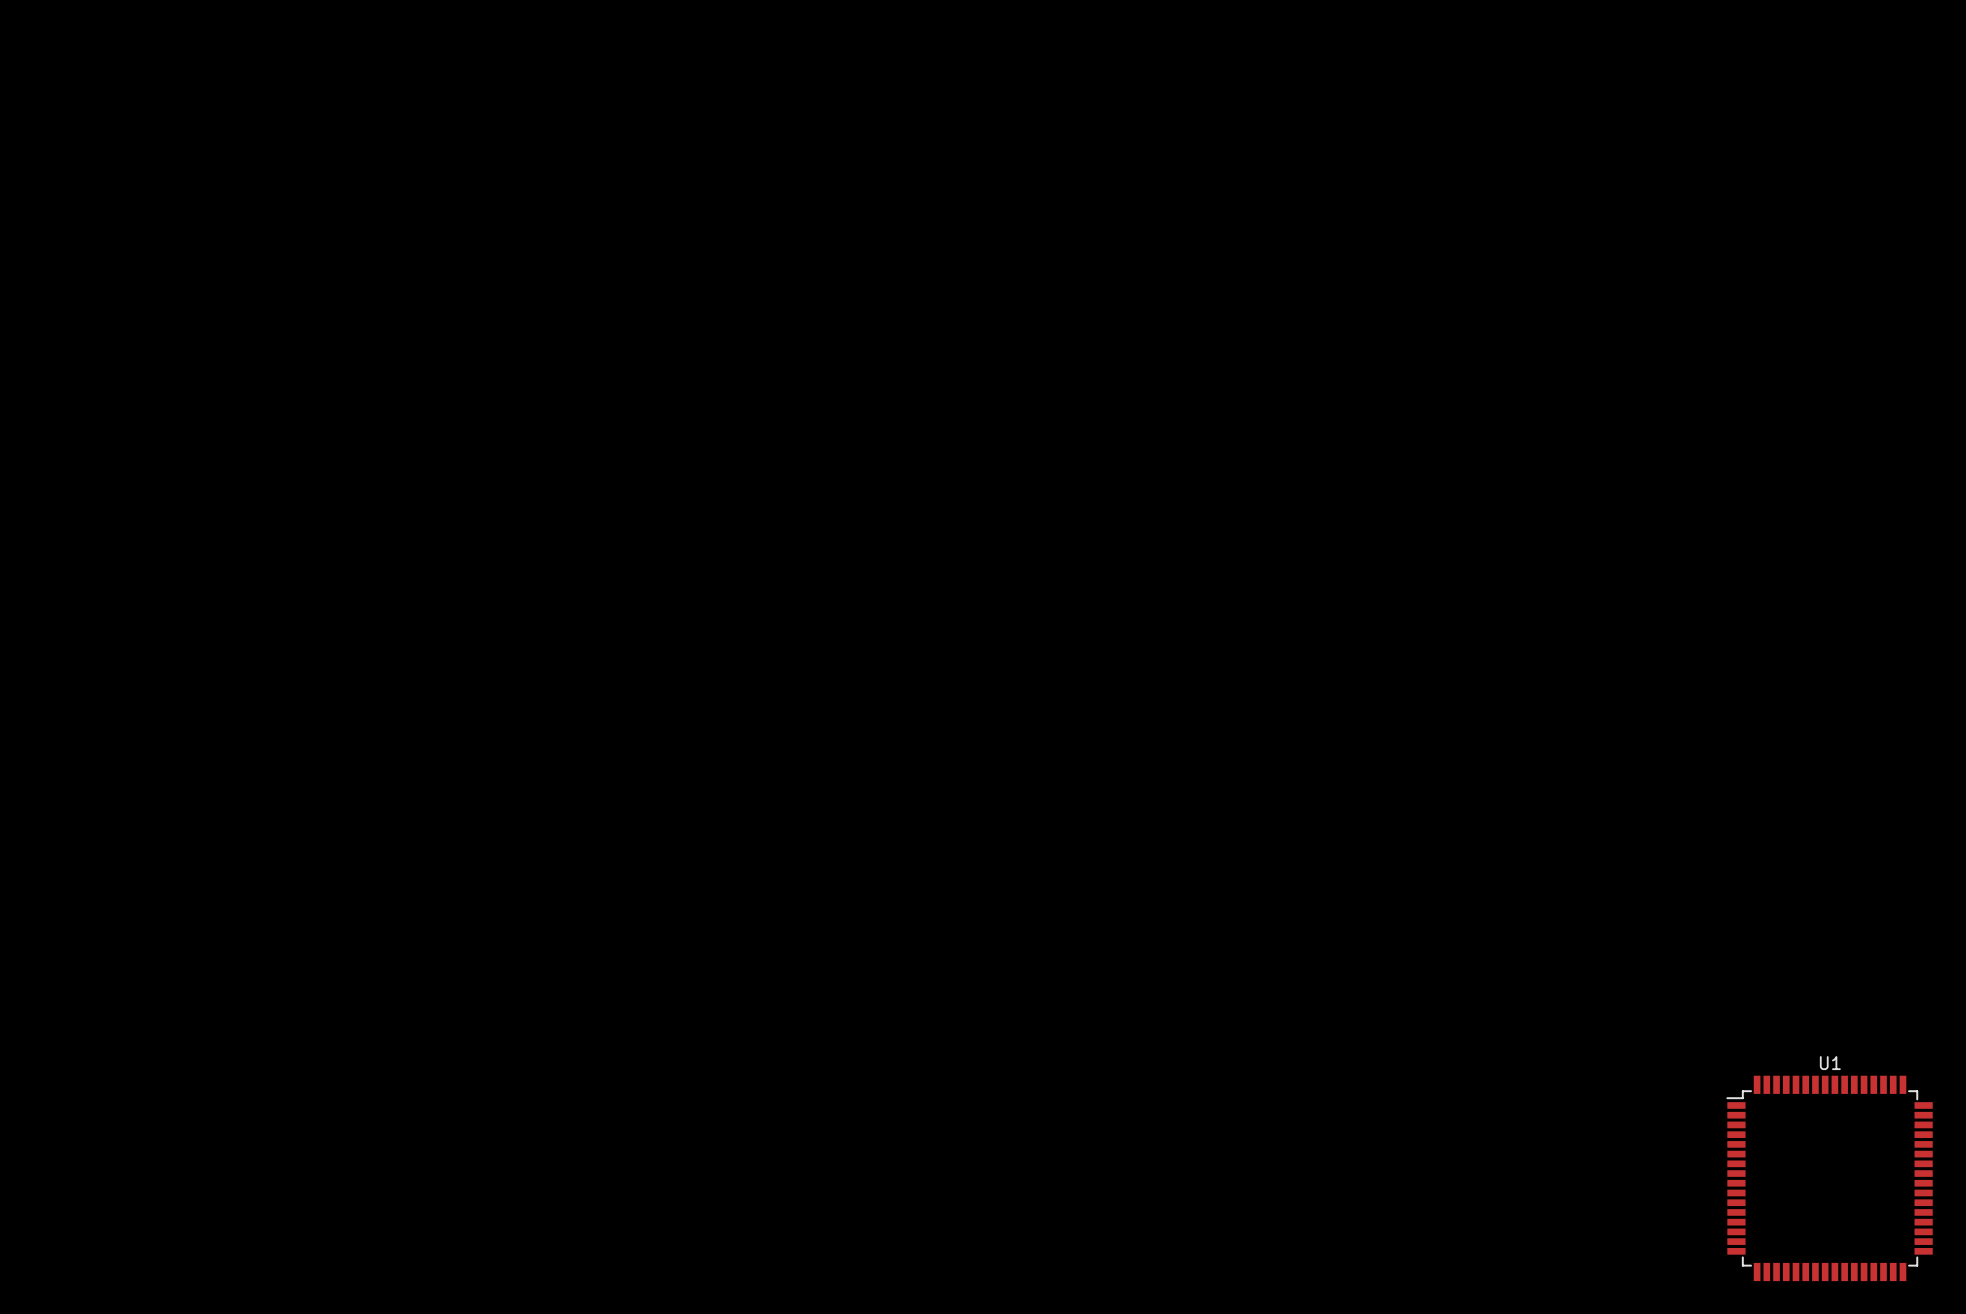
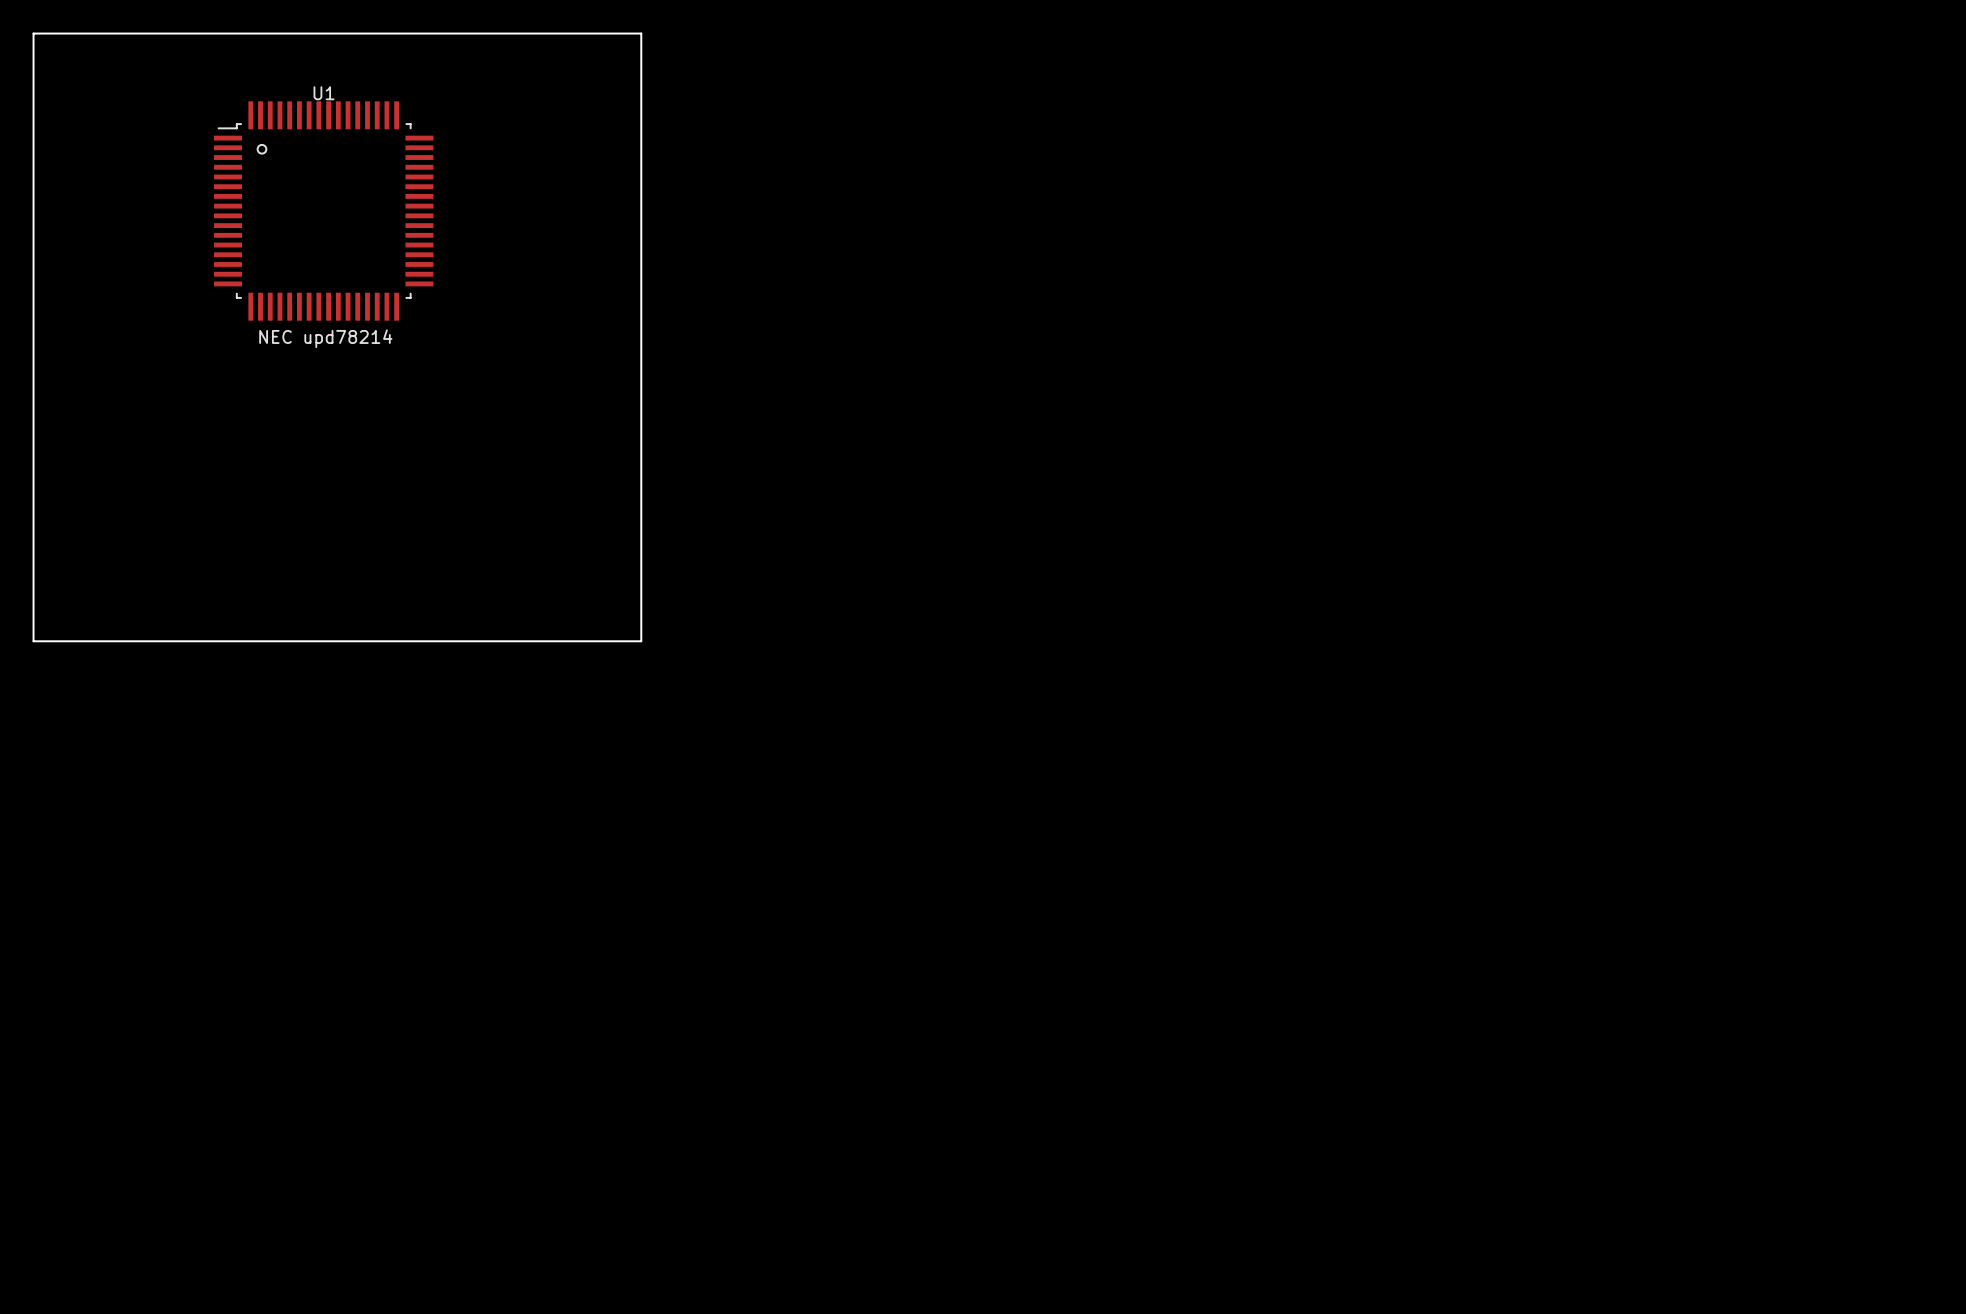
board edge: none -> (33, 33) (33, 641) (641, 641) (641, 33) (33, 33)
text: none -> NEC upd78214 (325, 338)
U1 footprint: [1726, 1075, 1933, 1282] -> [214, 101, 434, 321]

